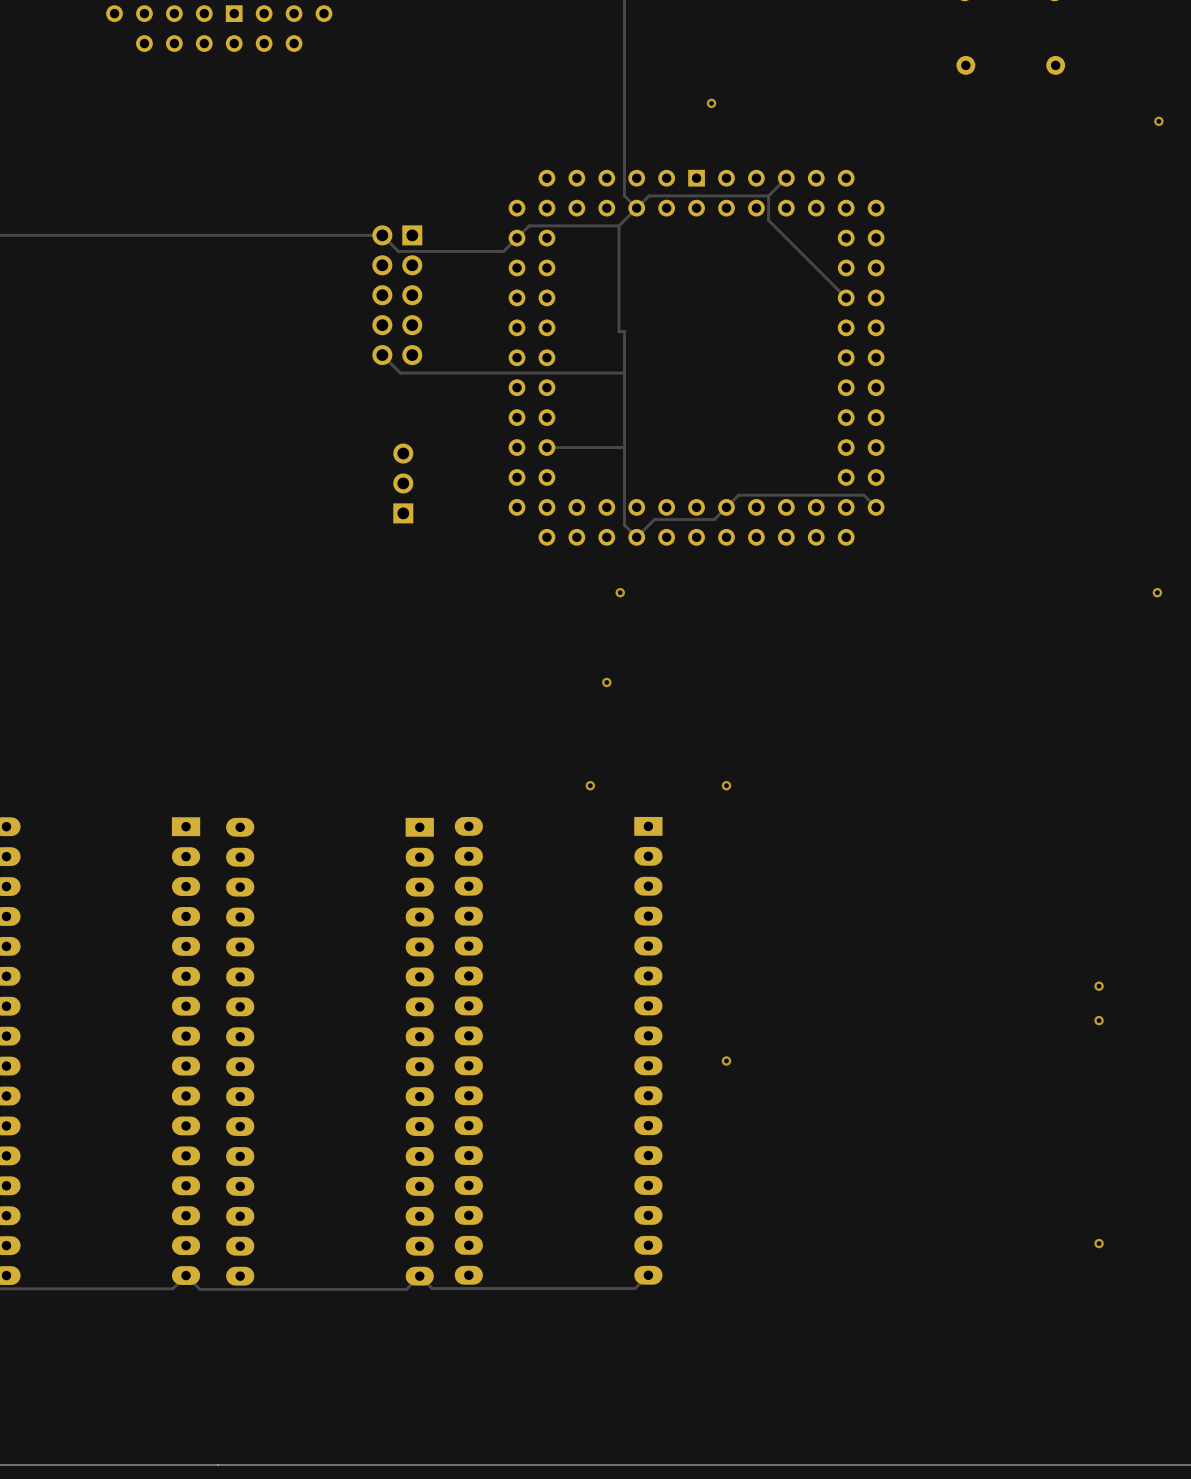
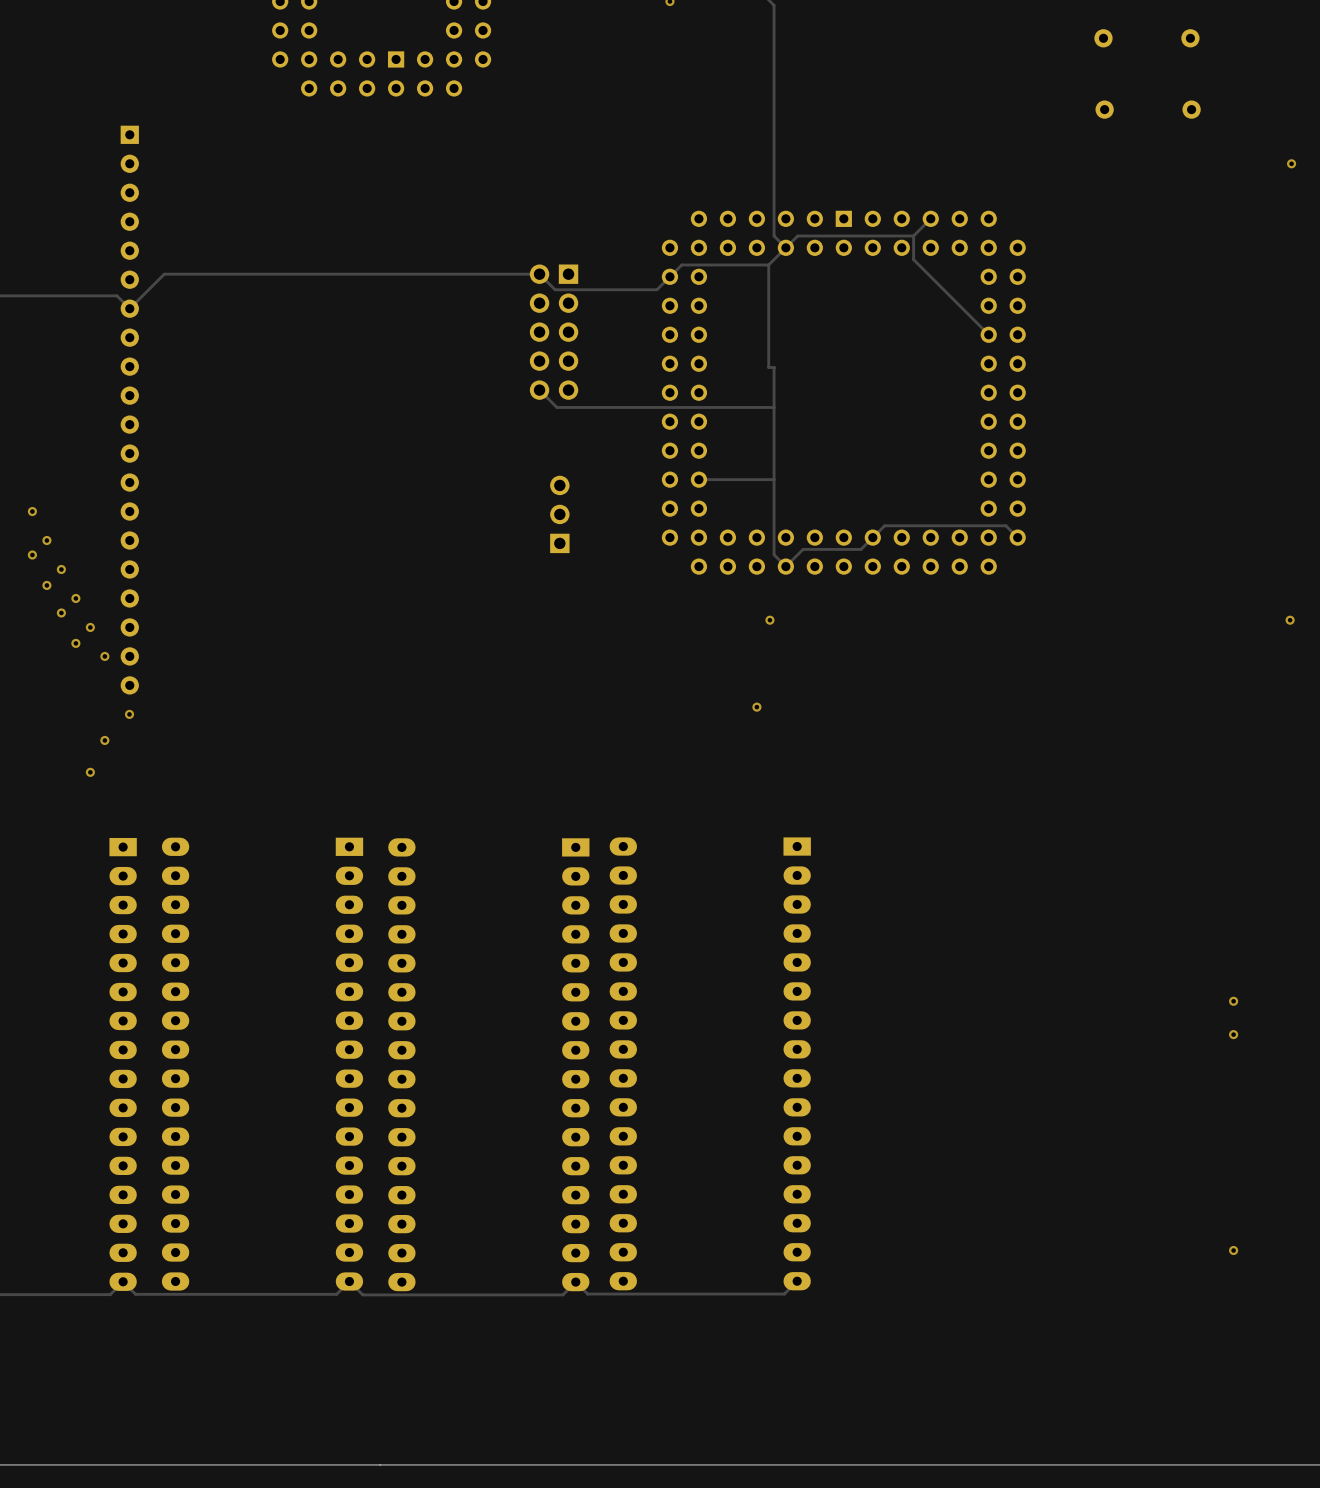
via: (711, 103) -> none
via: (590, 785) -> none
via: (726, 785) -> none
via: (726, 1061) -> none

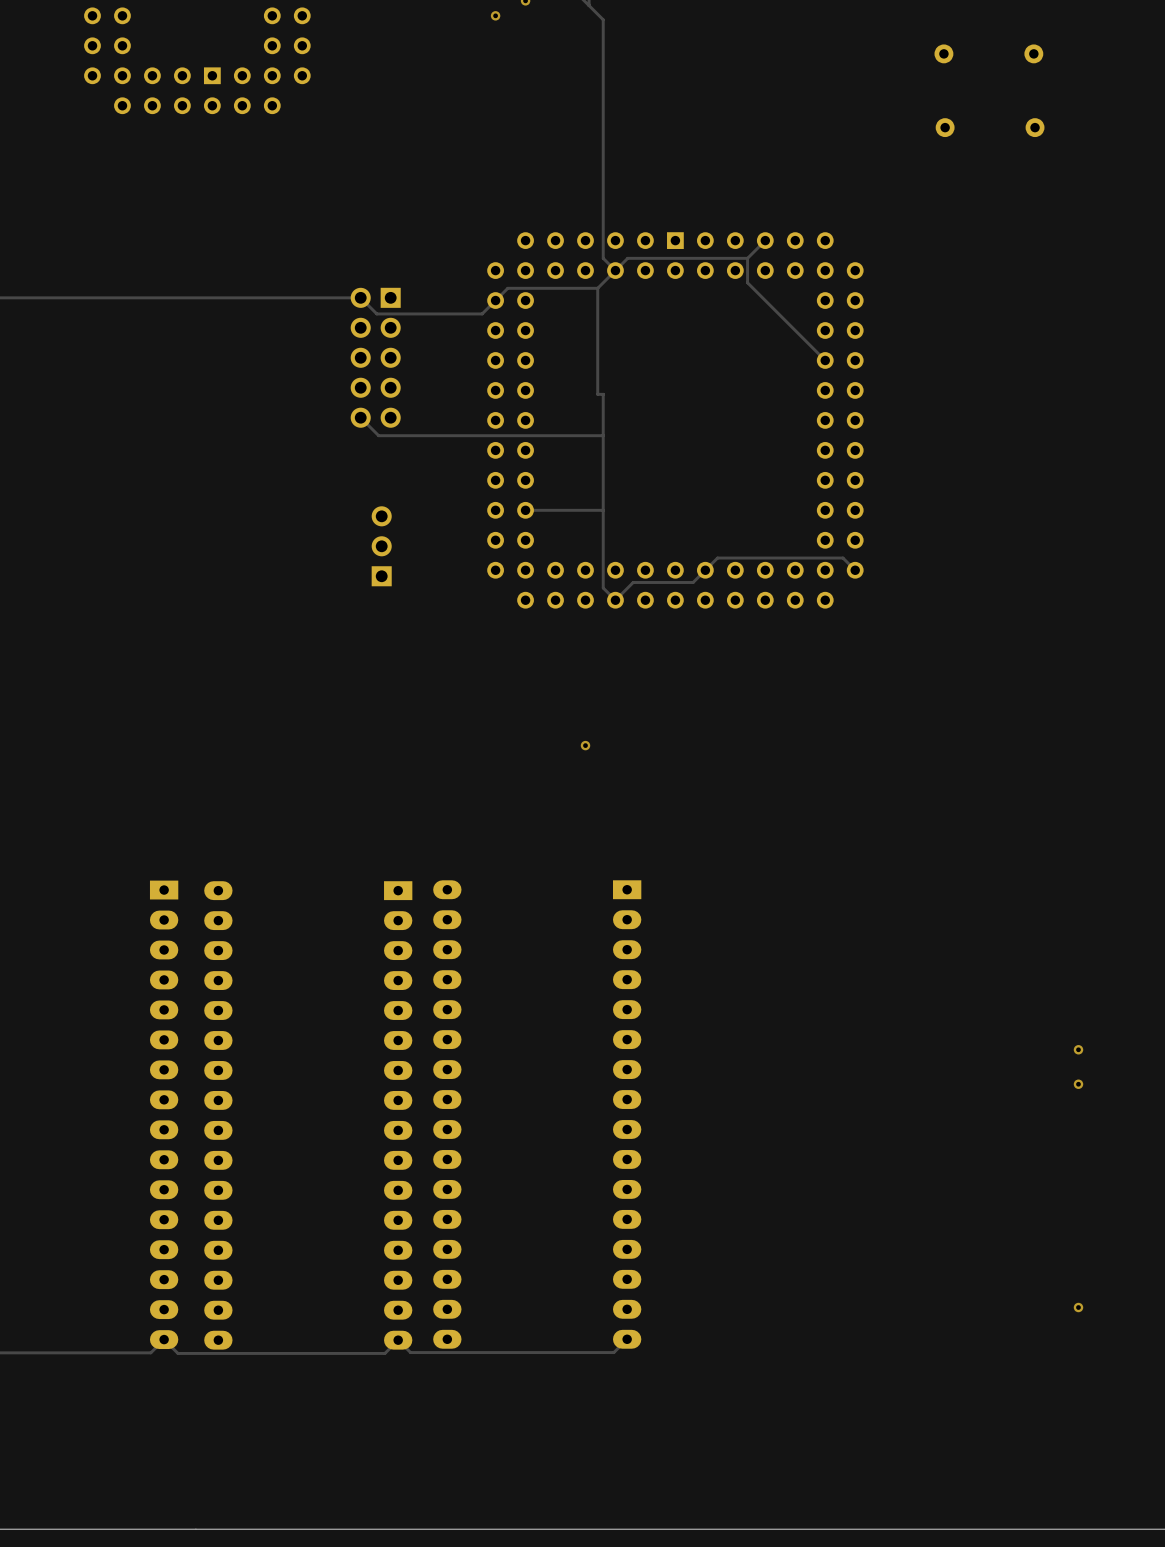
via: (1291, 163) -> none
via: (769, 620) -> none
via: (1290, 620) -> none

